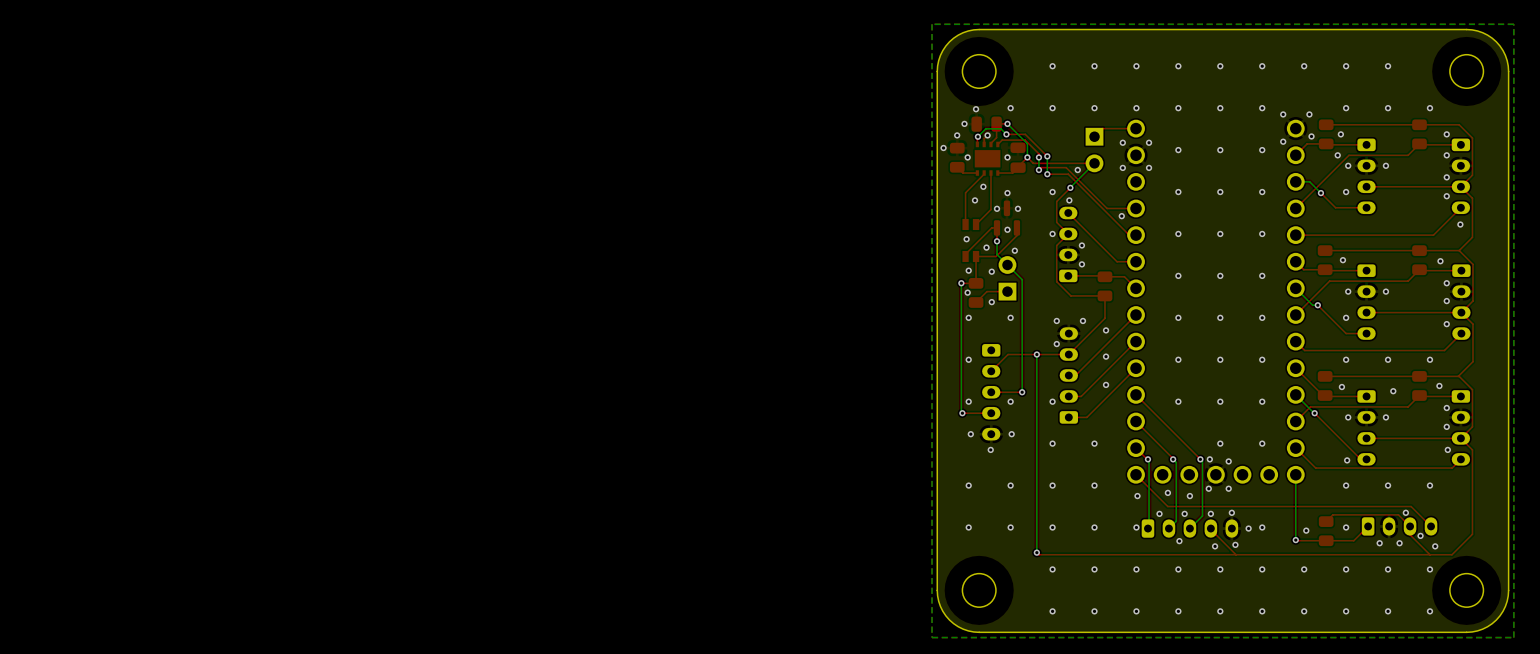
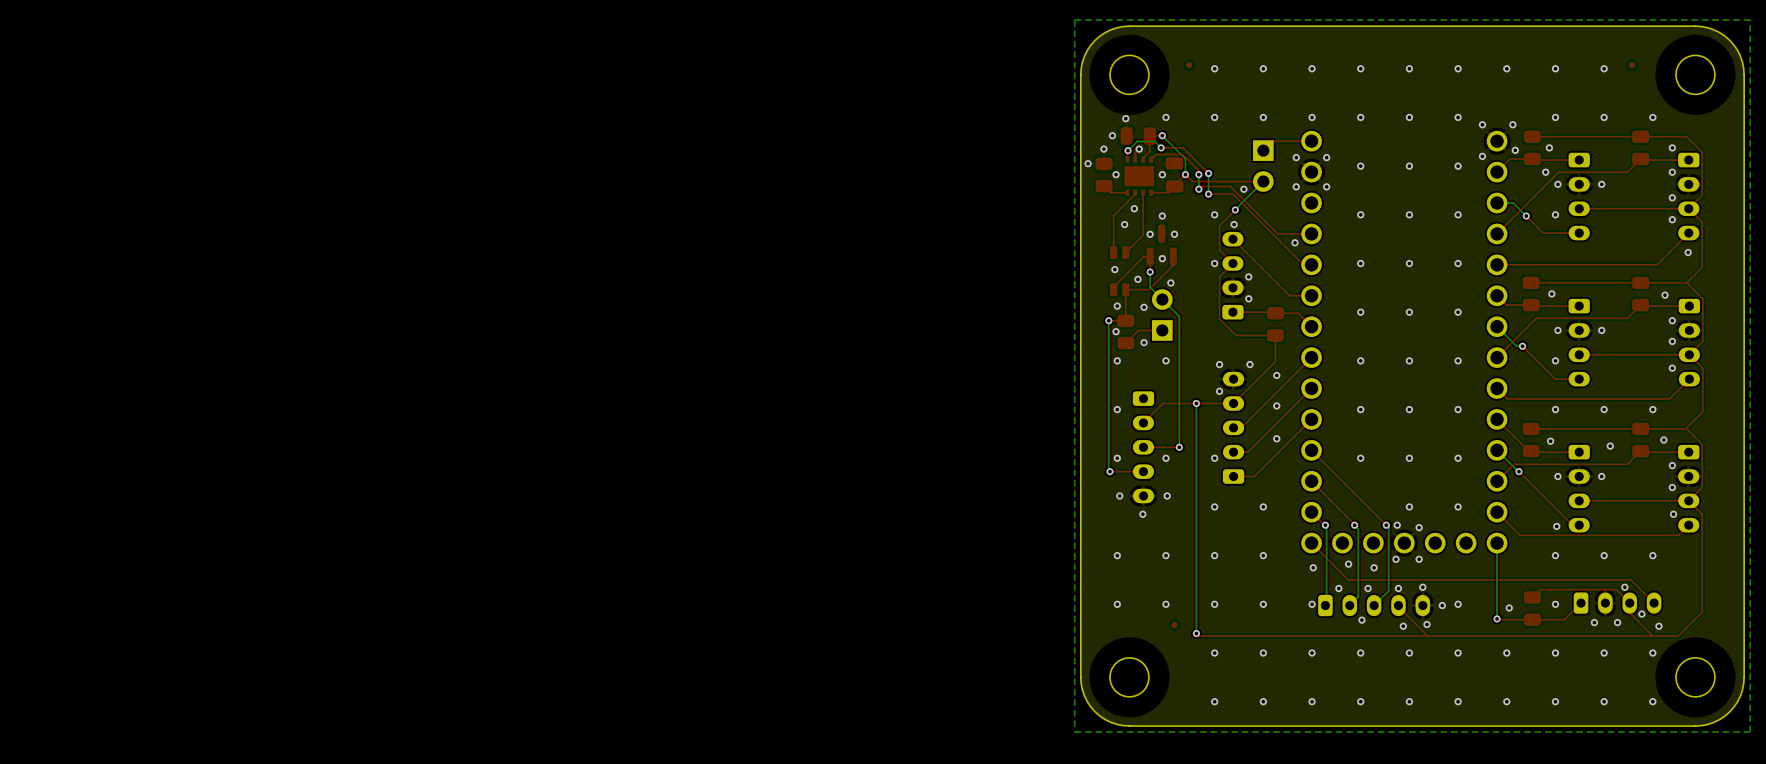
part: none -> (1189, 65)
part: none -> (1632, 65)
part: none -> (1174, 625)

